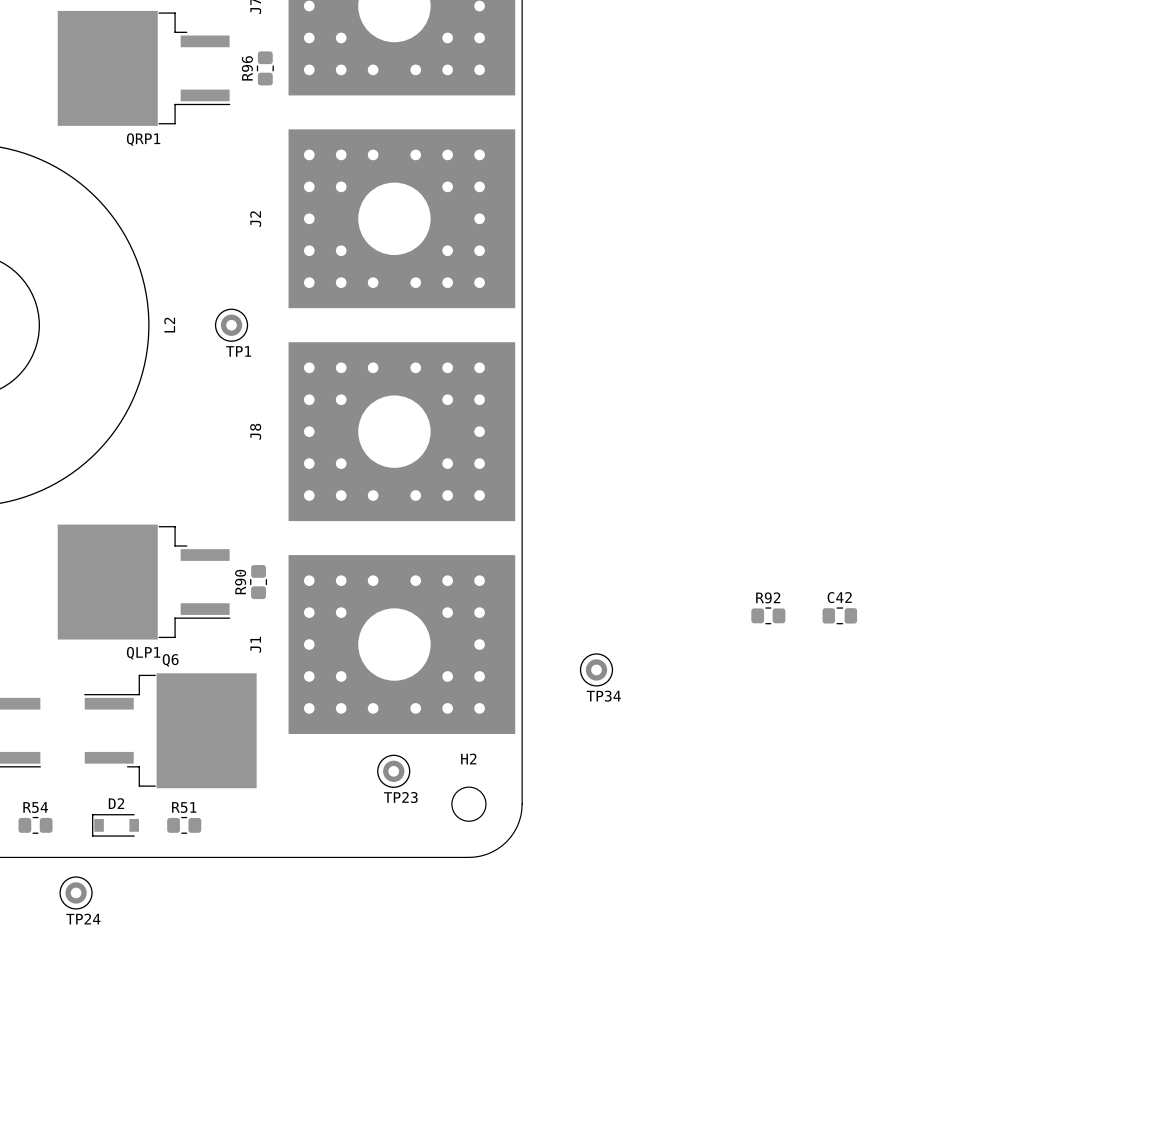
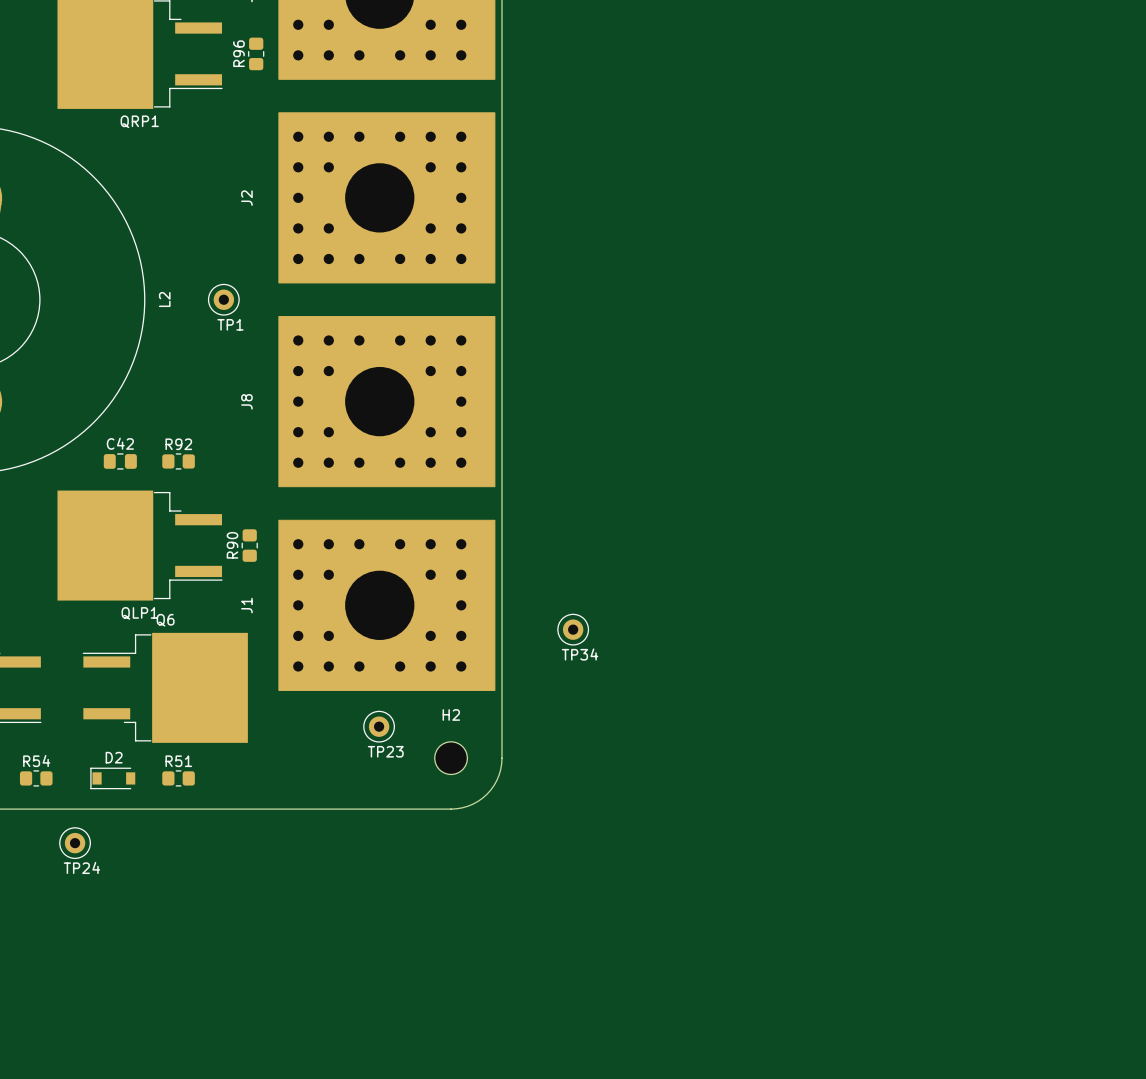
R92 position: (768, 615) -> (178, 461)
C42 position: (839, 615) -> (120, 461)

